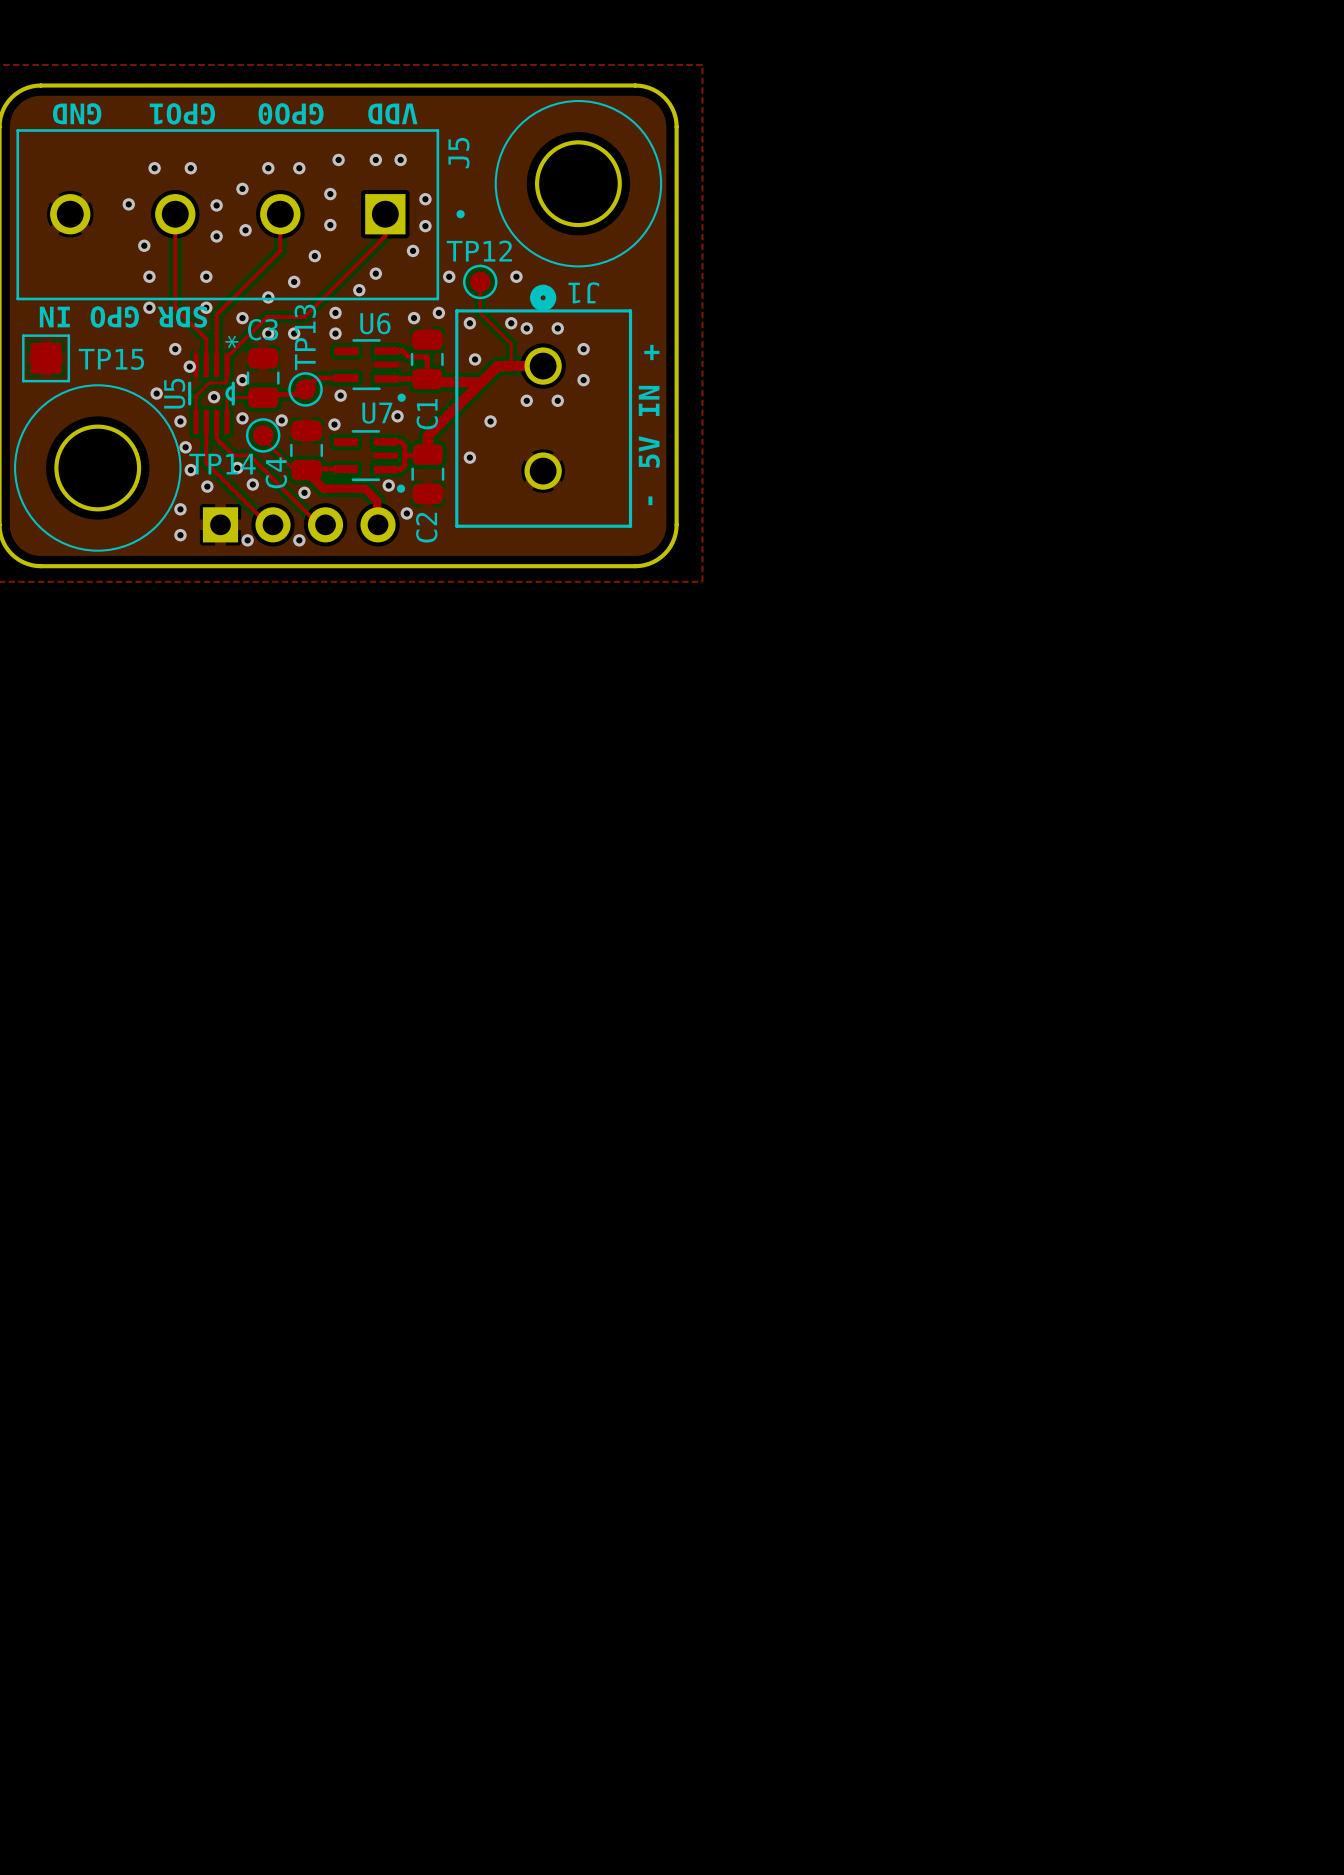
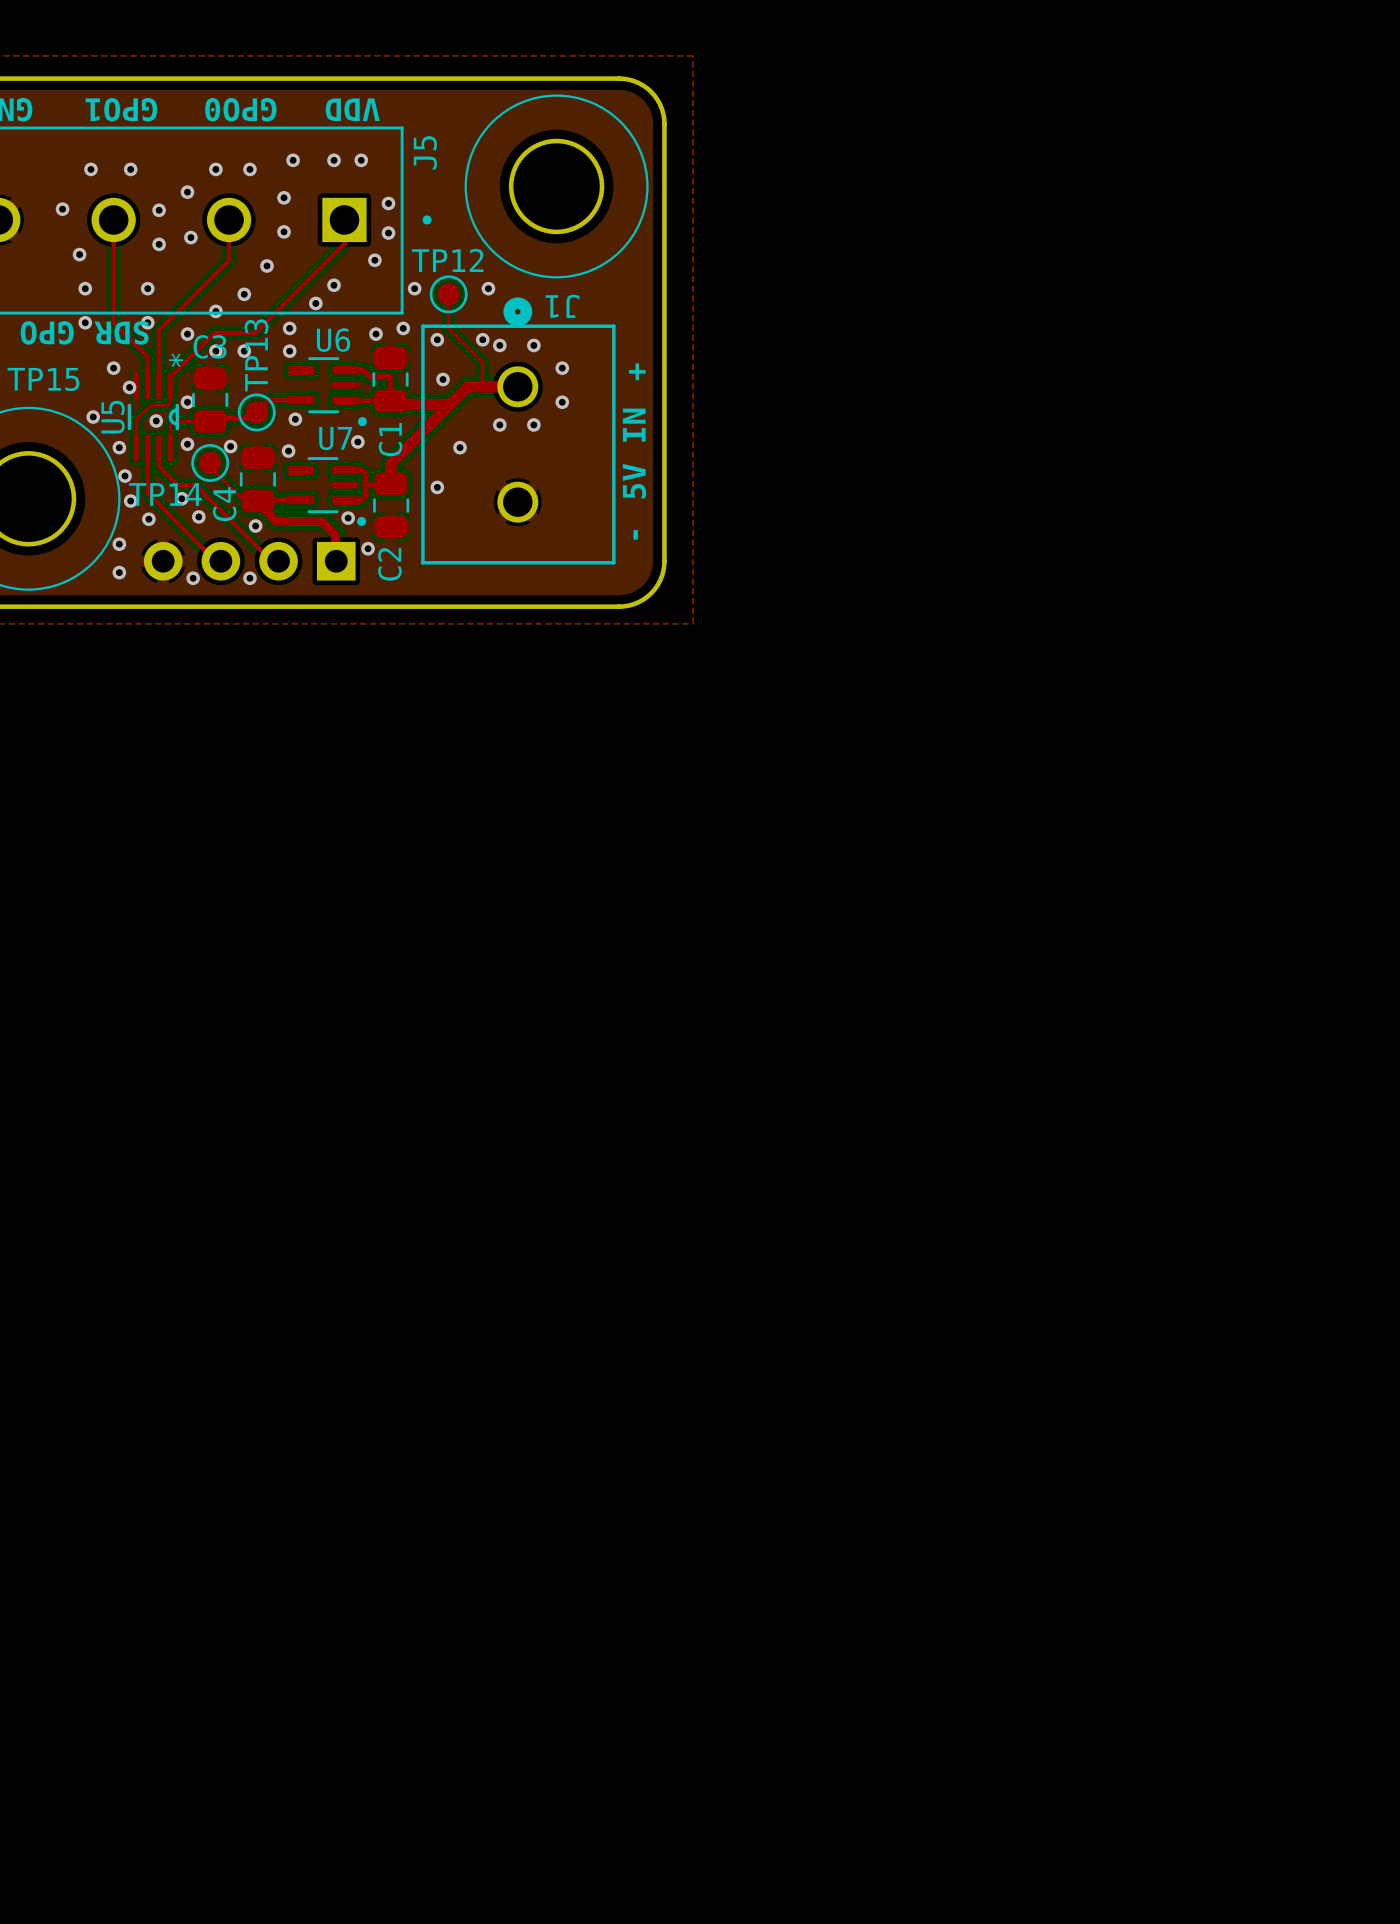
part rotation: 0° (299, 524) -> 180° (249, 561)

